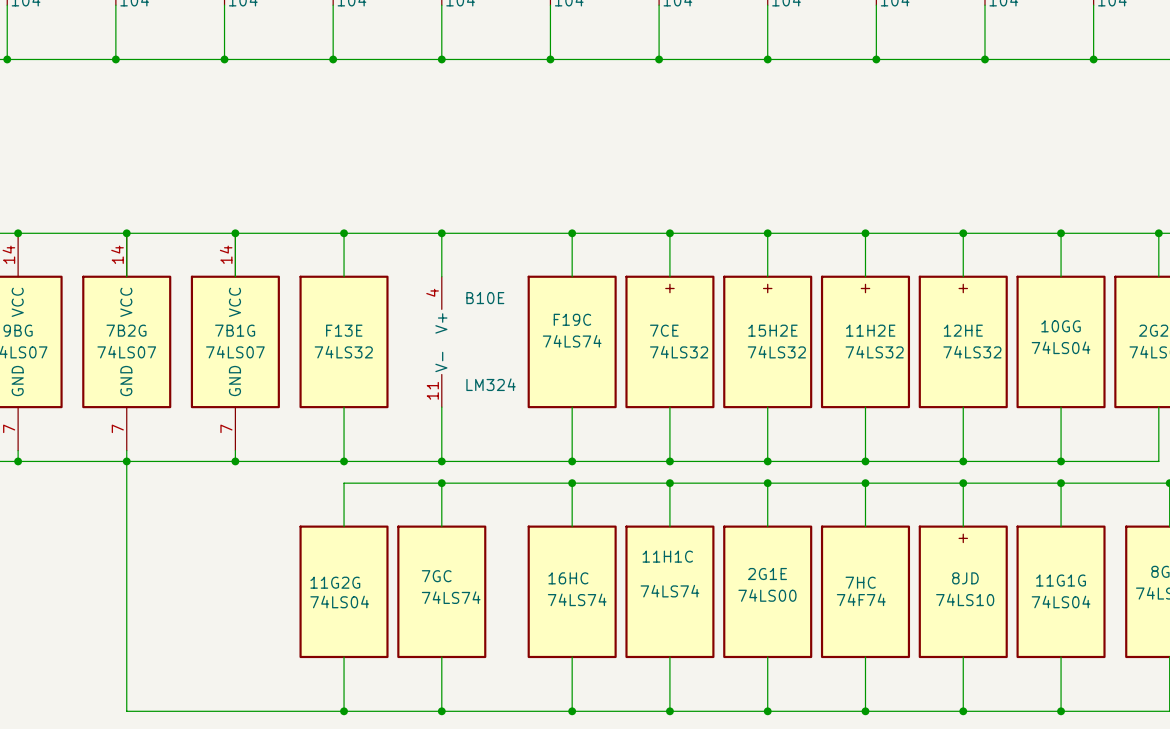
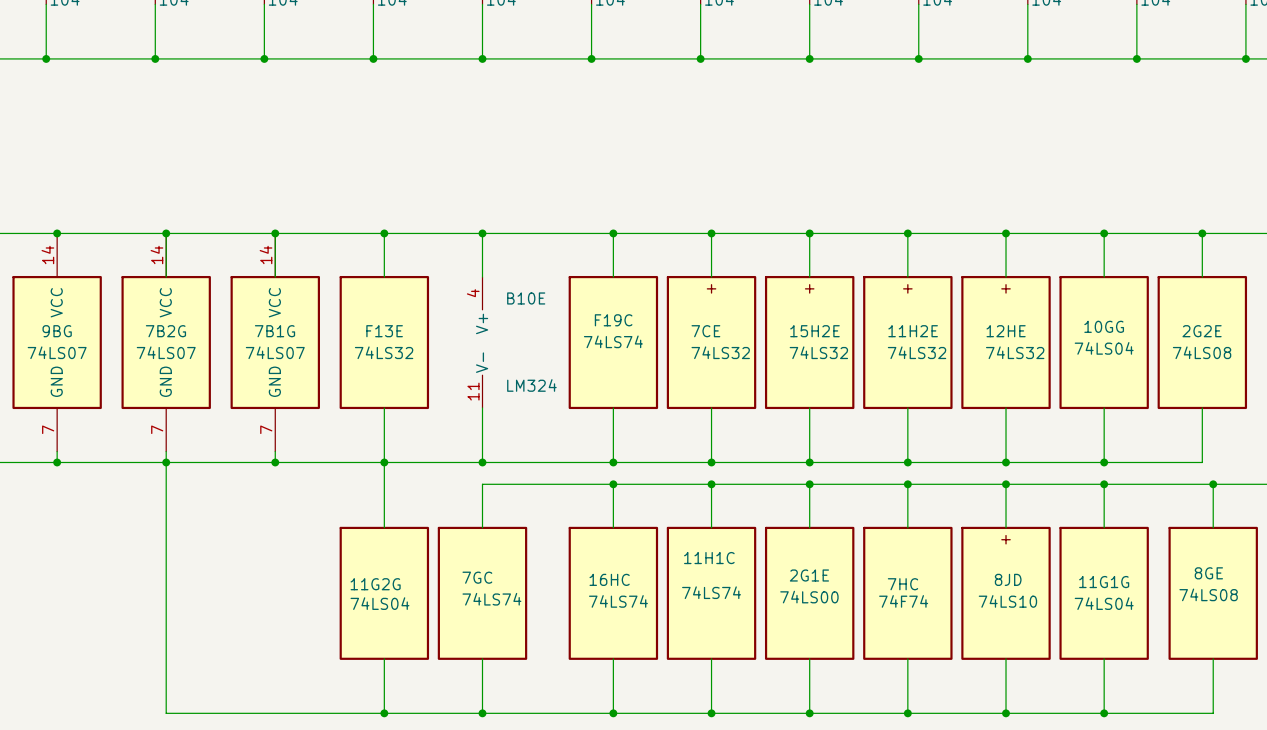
wire: (344, 483) (441, 483) -> (384, 484) (384, 462)
junction: (441, 483) -> none

